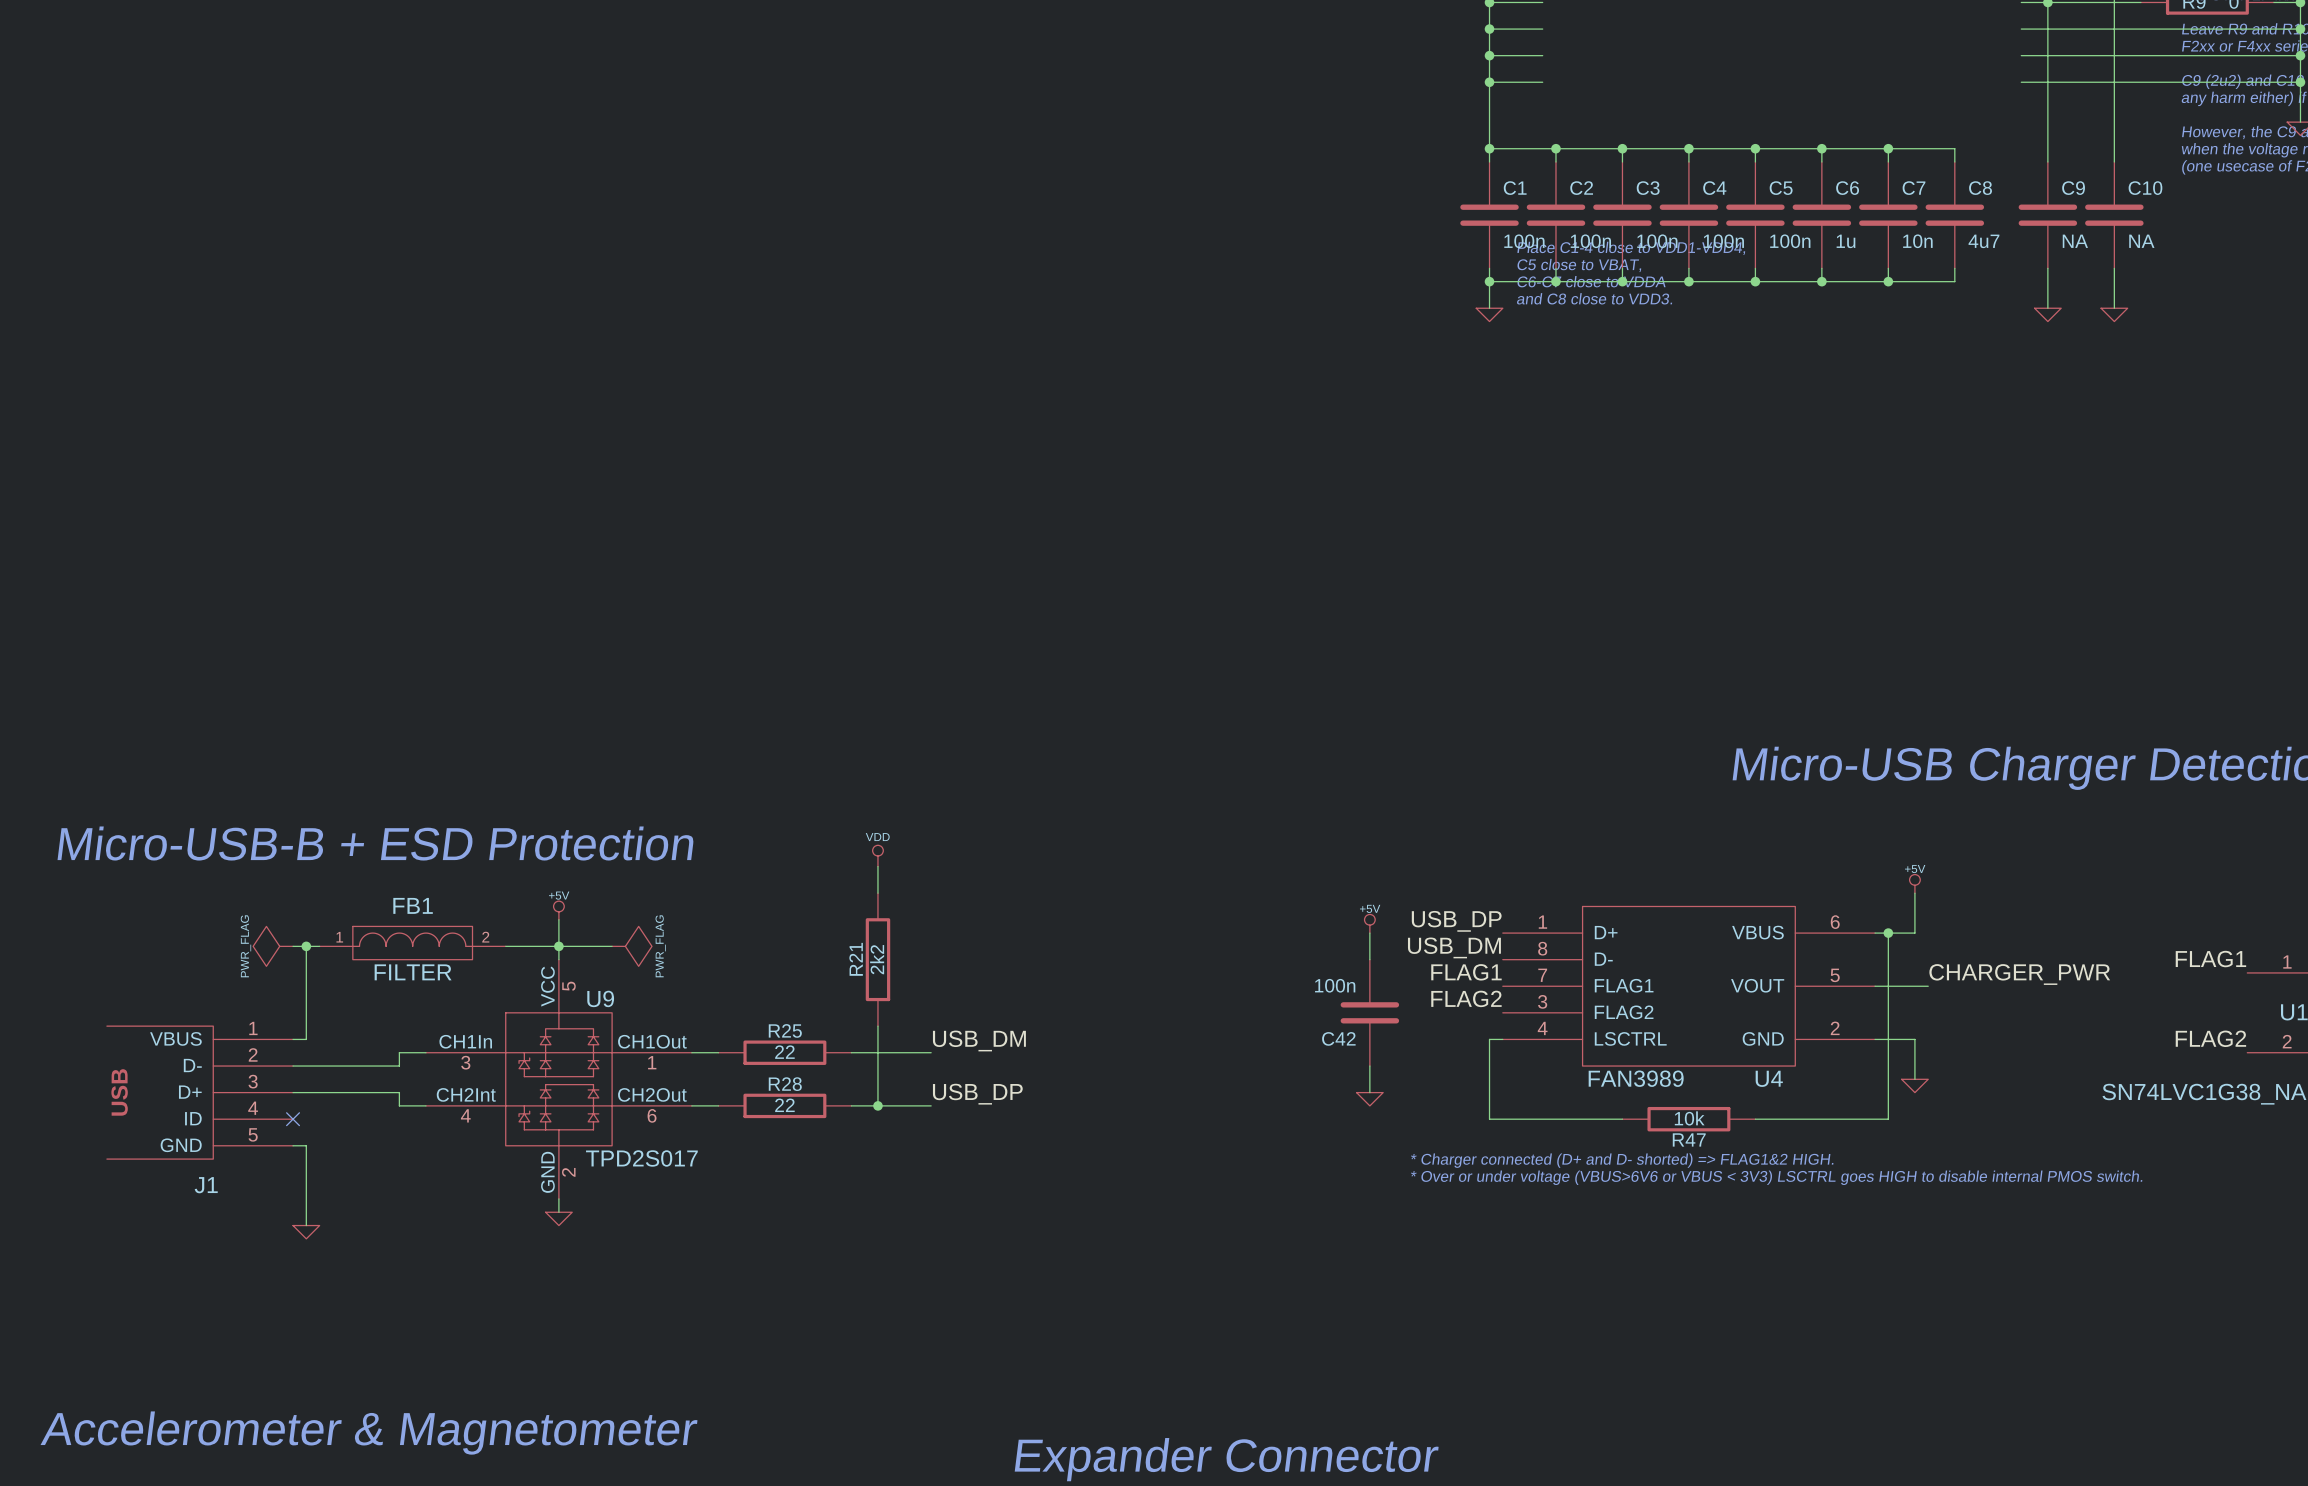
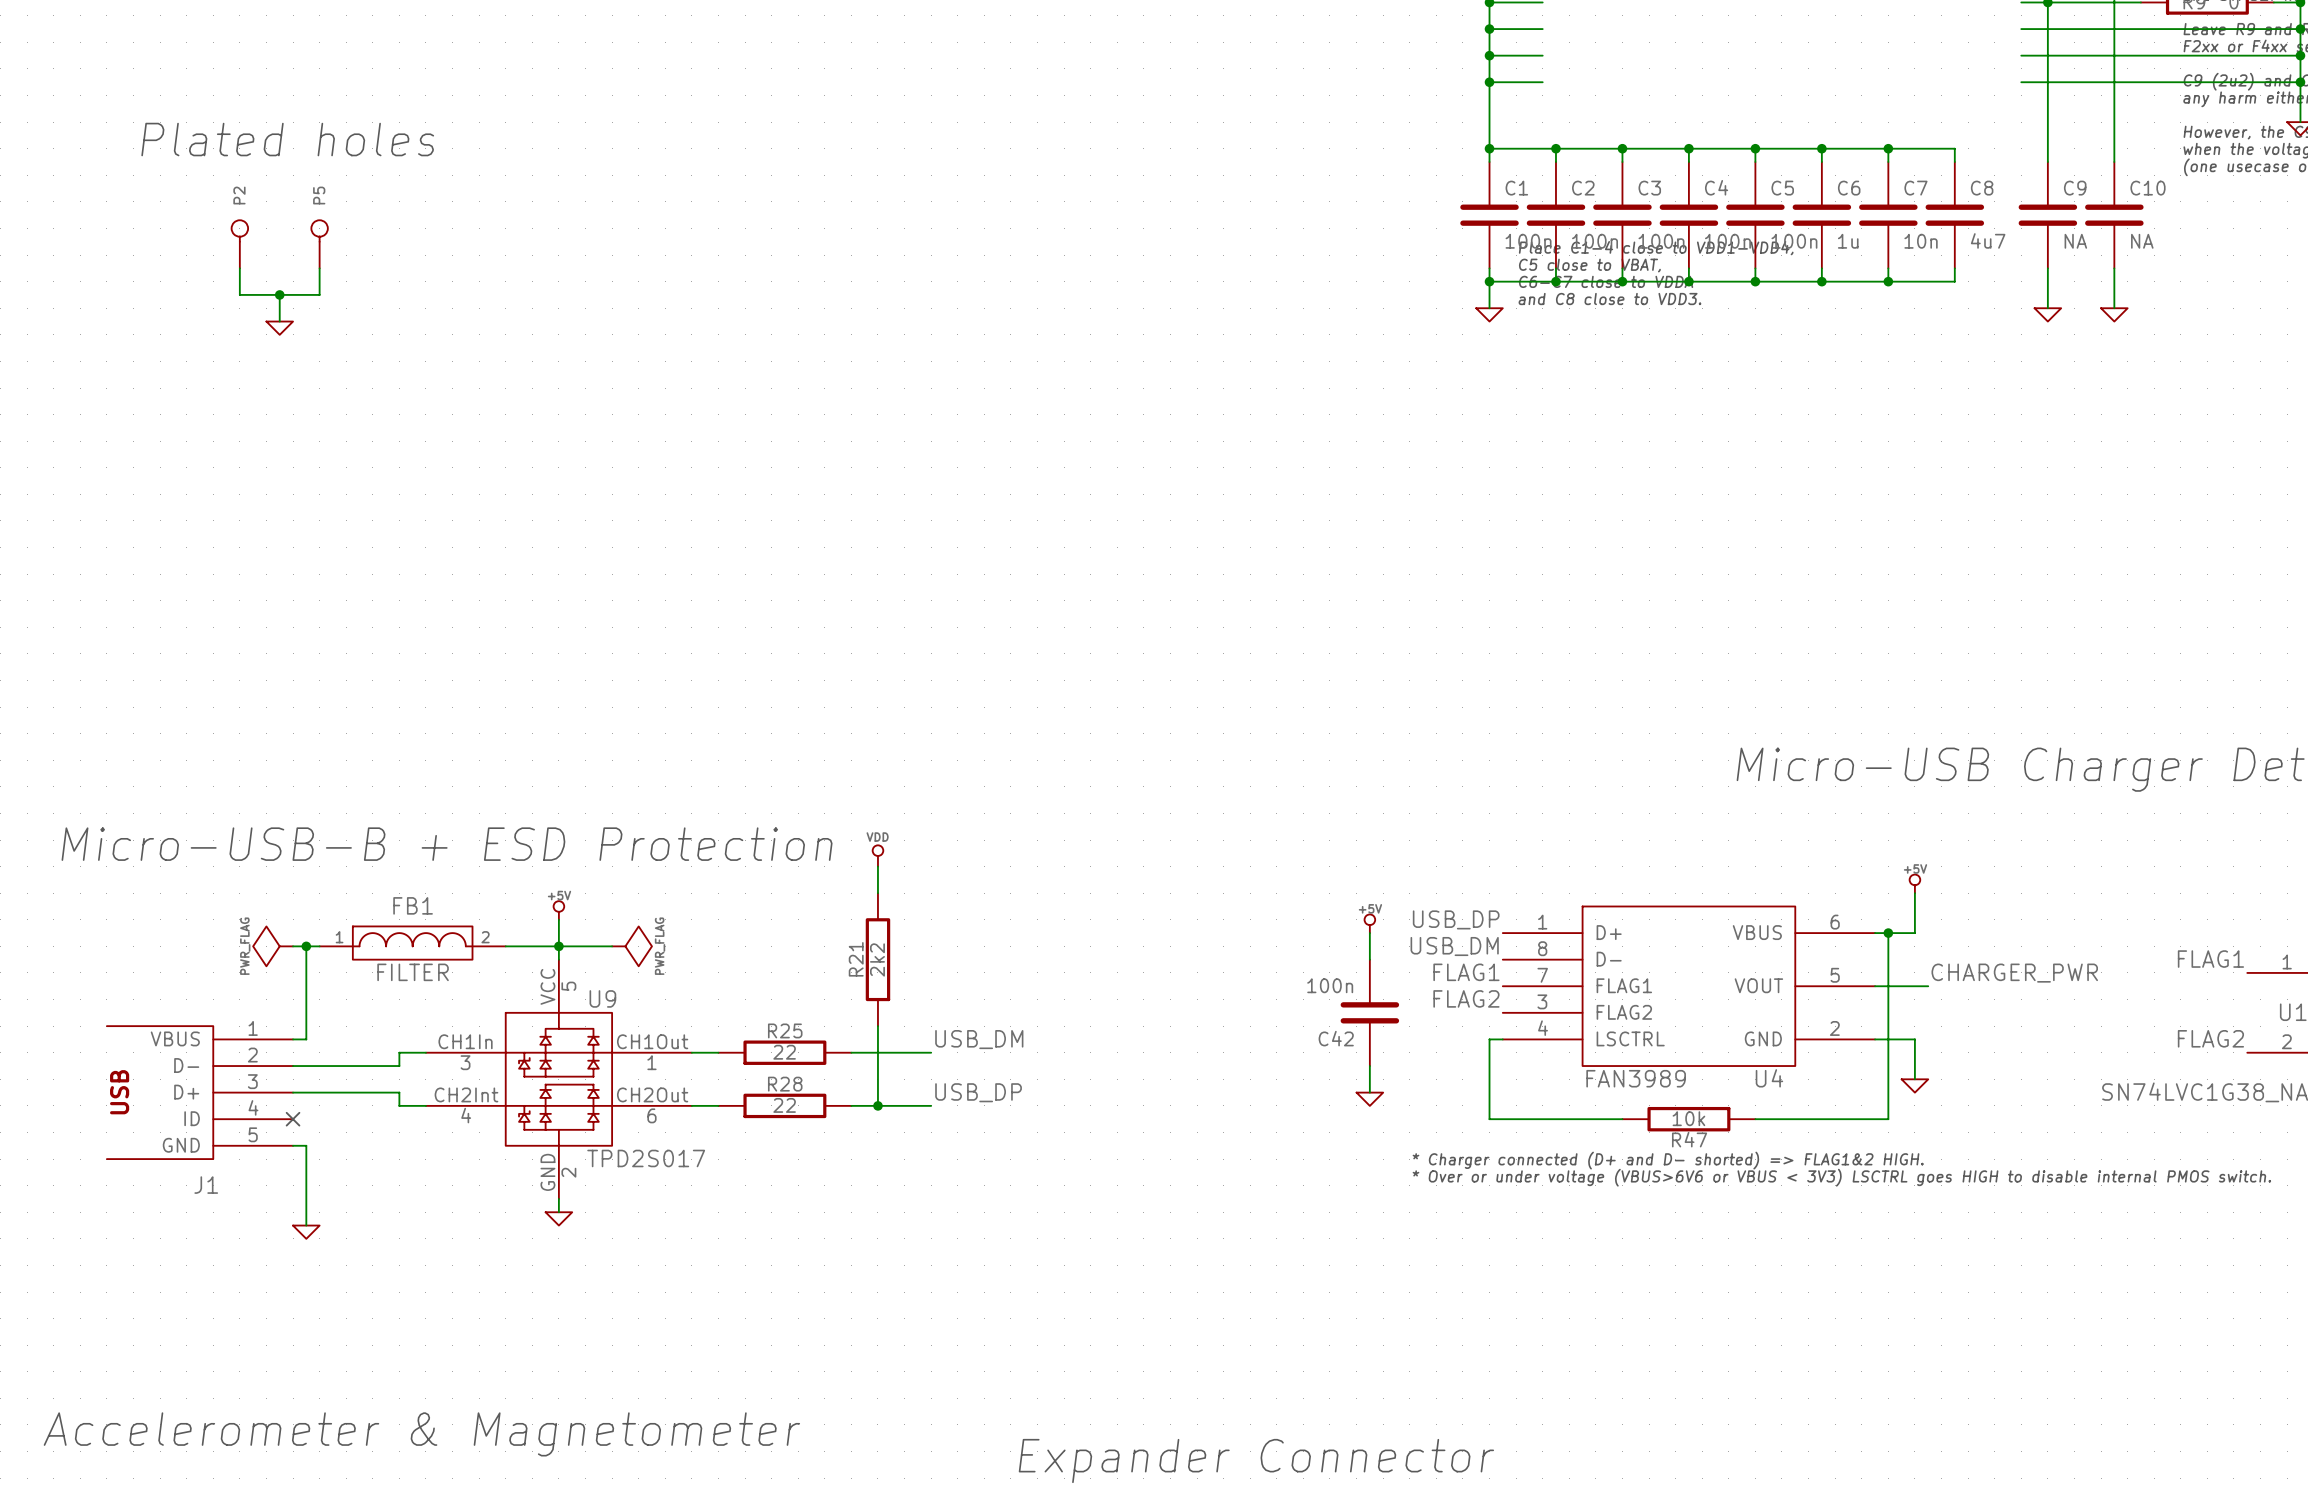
text: none -> Plated holes (287, 139)
P2: none -> (239, 244)
P5: none -> (319, 244)
wire: none -> (239, 268) (239, 294) (319, 294) (319, 268)
wire: none -> (279, 294) (279, 321)
junction: none -> (279, 294)
power symbol: none -> (279, 328)

